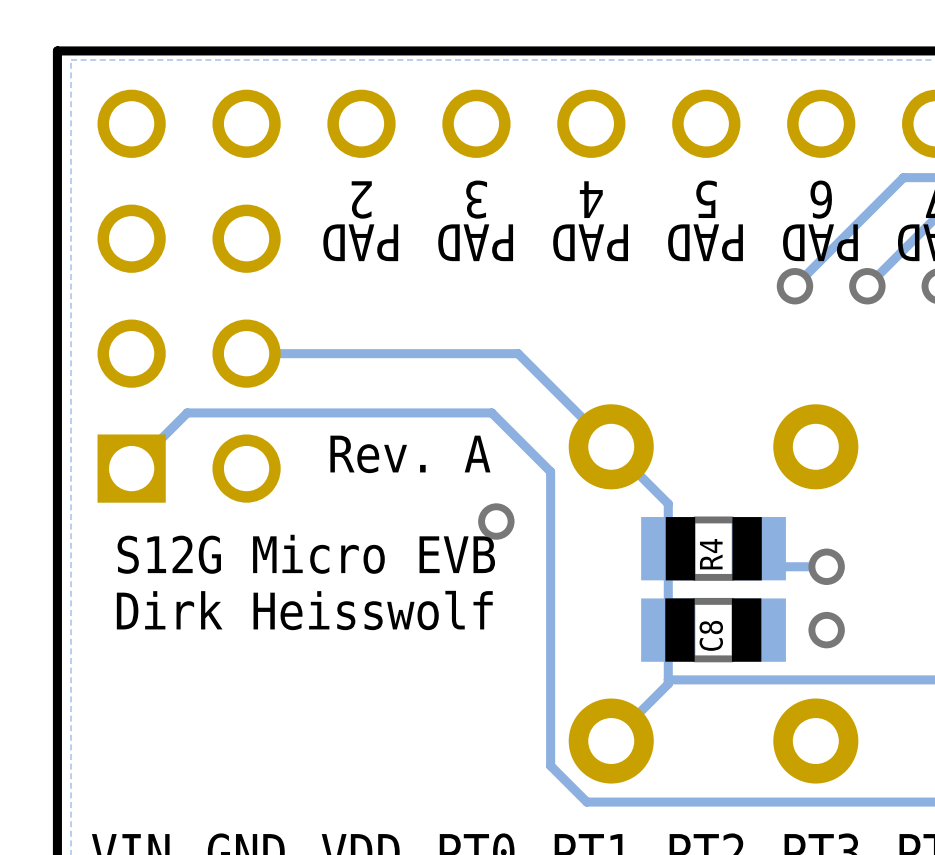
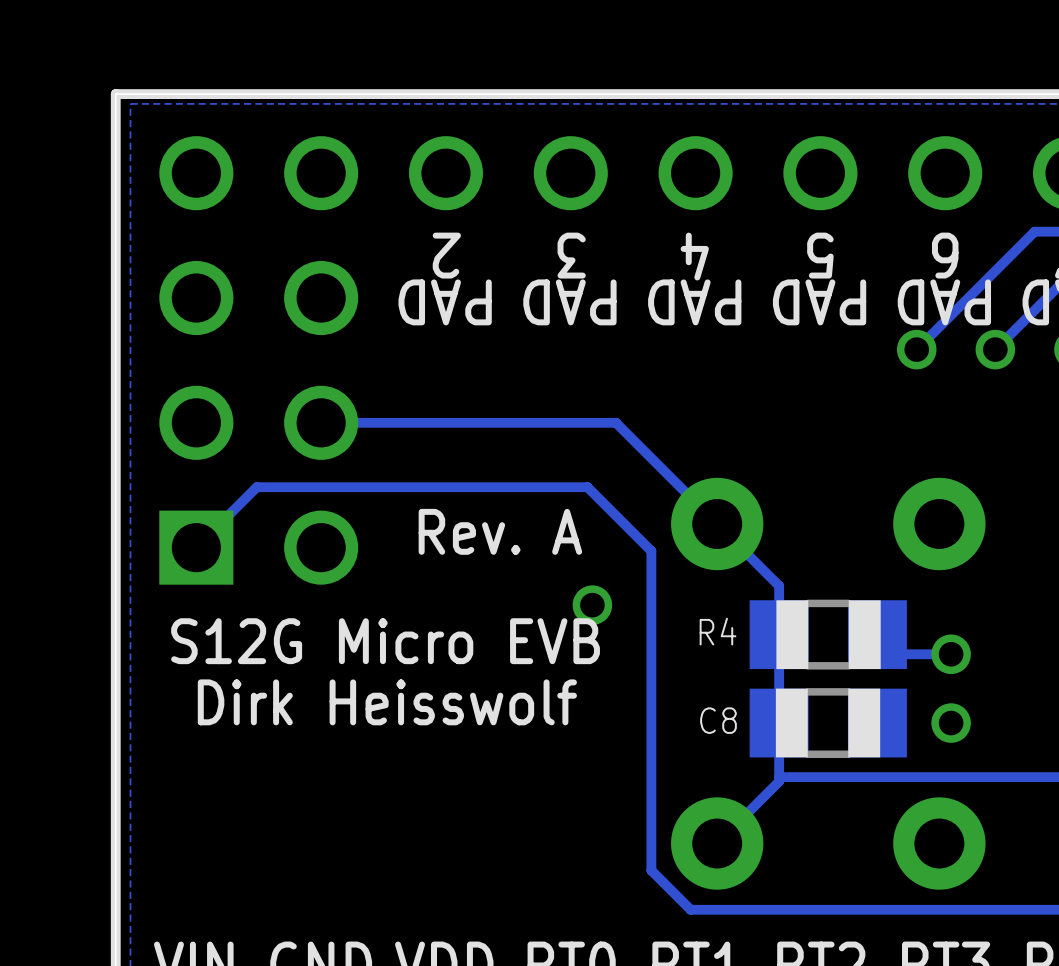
R4 name rotation: 0° (711, 554) -> 90° clockwise (718, 631)
R4 name position: R4 (711, 554) -> R4 (718, 631)
C8 name rotation: 0° (711, 635) -> 90° clockwise (718, 720)
C8 name position: C8 (711, 635) -> C8 (718, 720)

